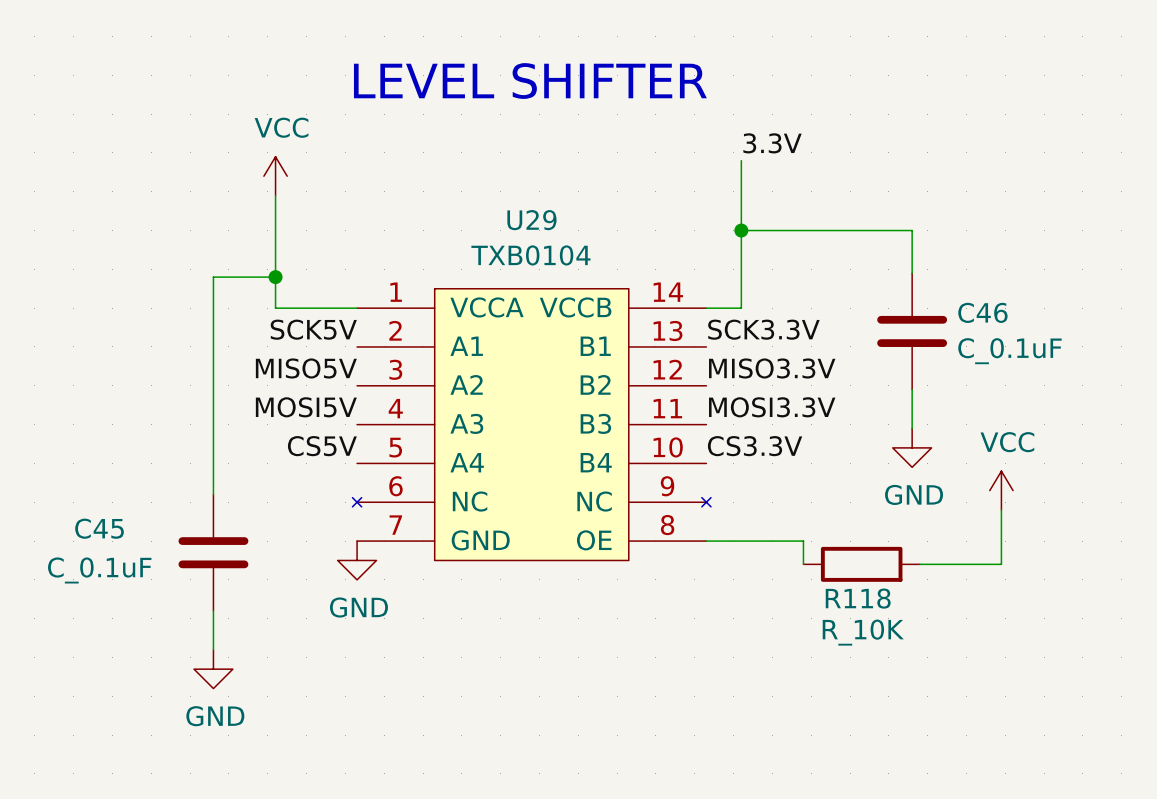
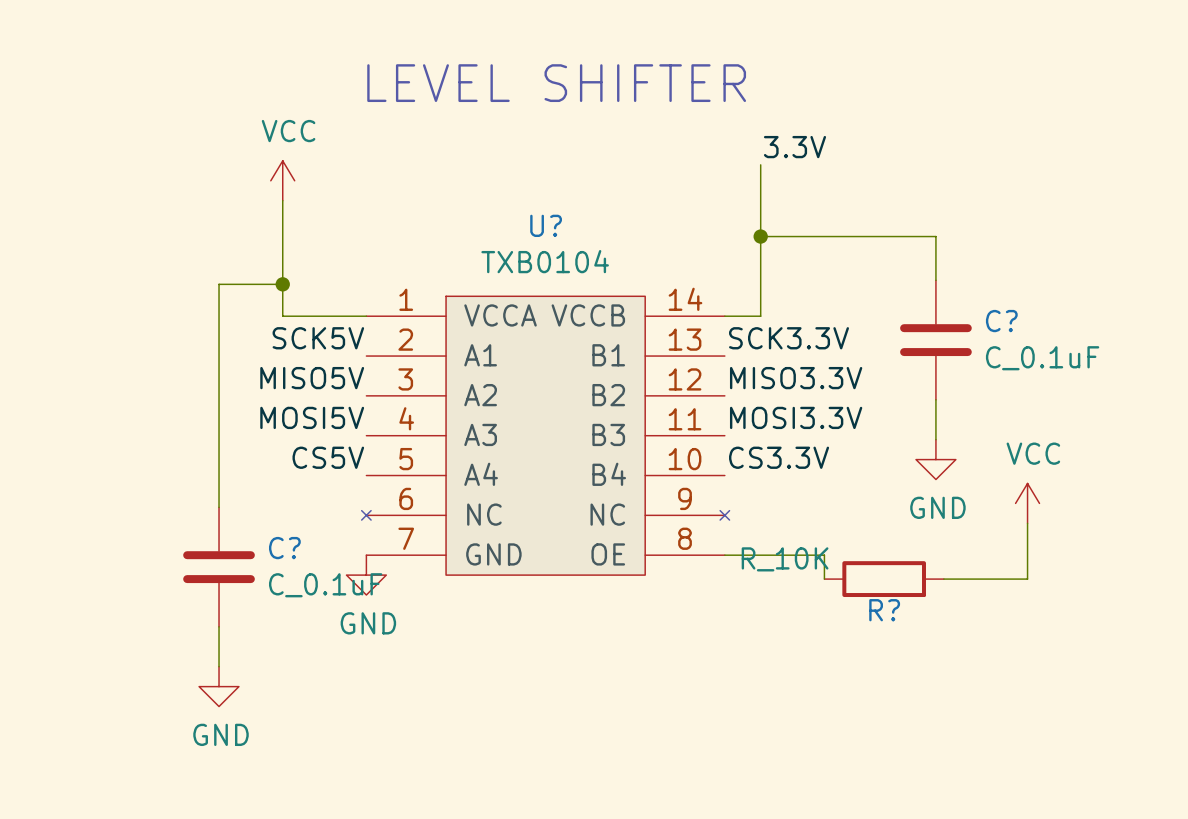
U29 name: U29 (531, 220) -> U? (546, 225)
C46 name: C46 (982, 312) -> C? (1001, 321)
C45 name: C45 (99, 528) -> C? (284, 548)
C45 value position: C_0.1uF (99, 570) -> C_0.1uF (325, 585)
R118 name: R118 (858, 598) -> R? (884, 610)
R118 value position: R_10K (863, 632) -> R_10K (785, 559)

